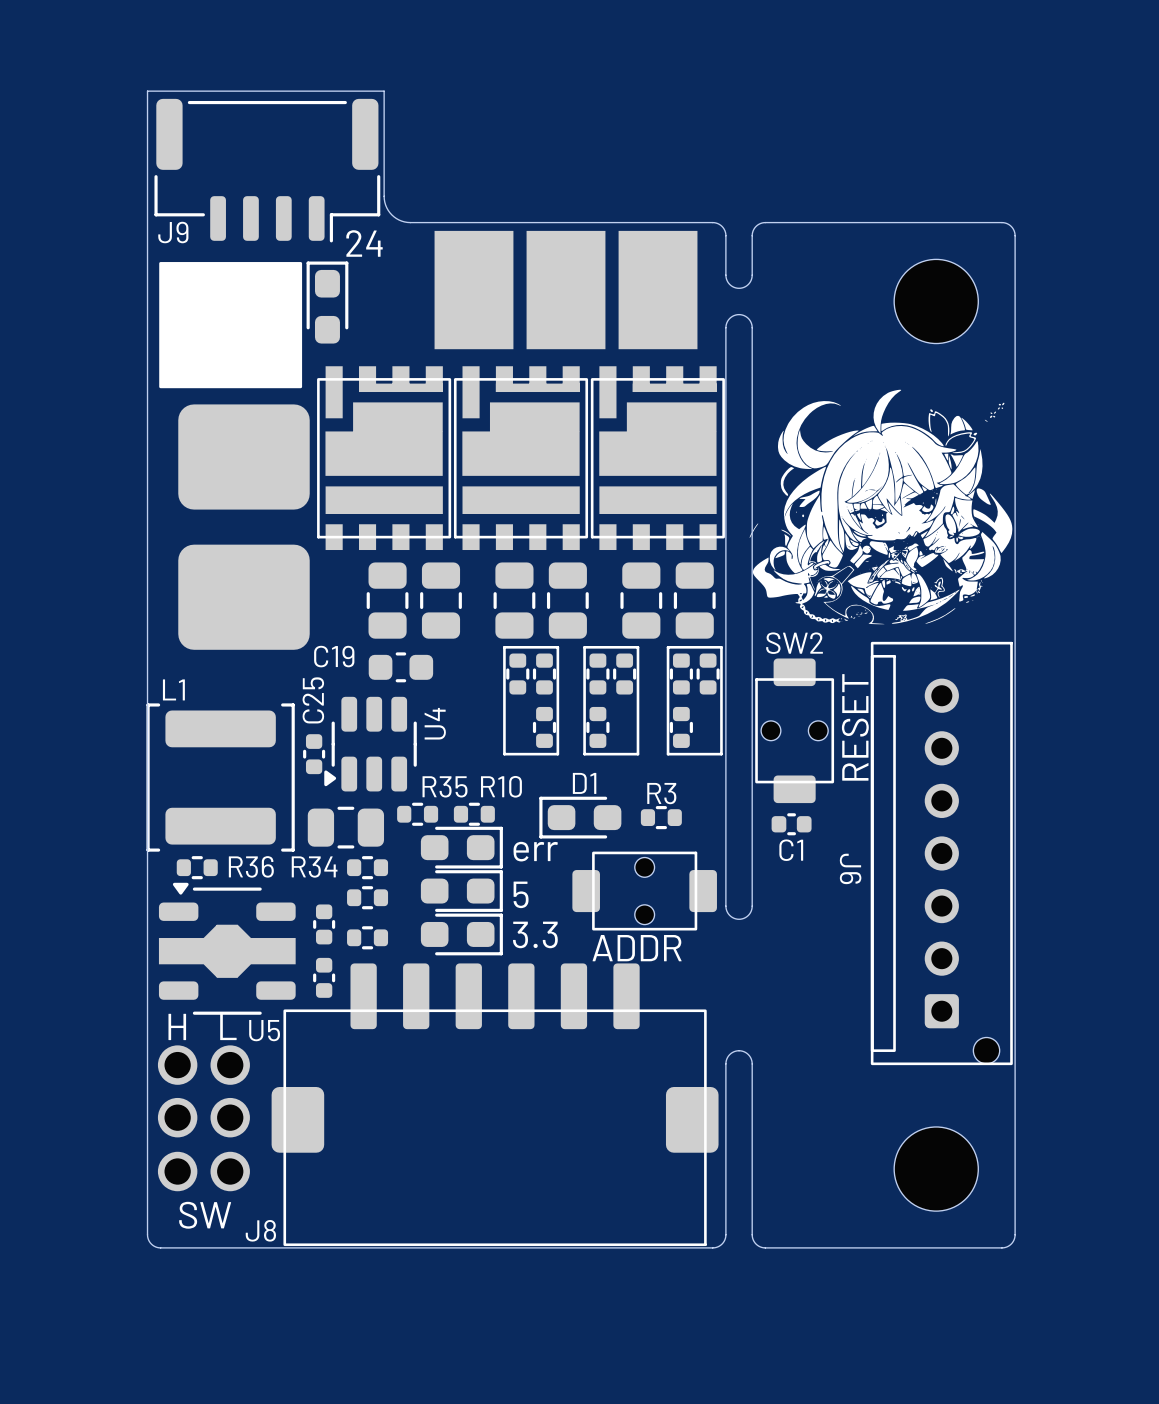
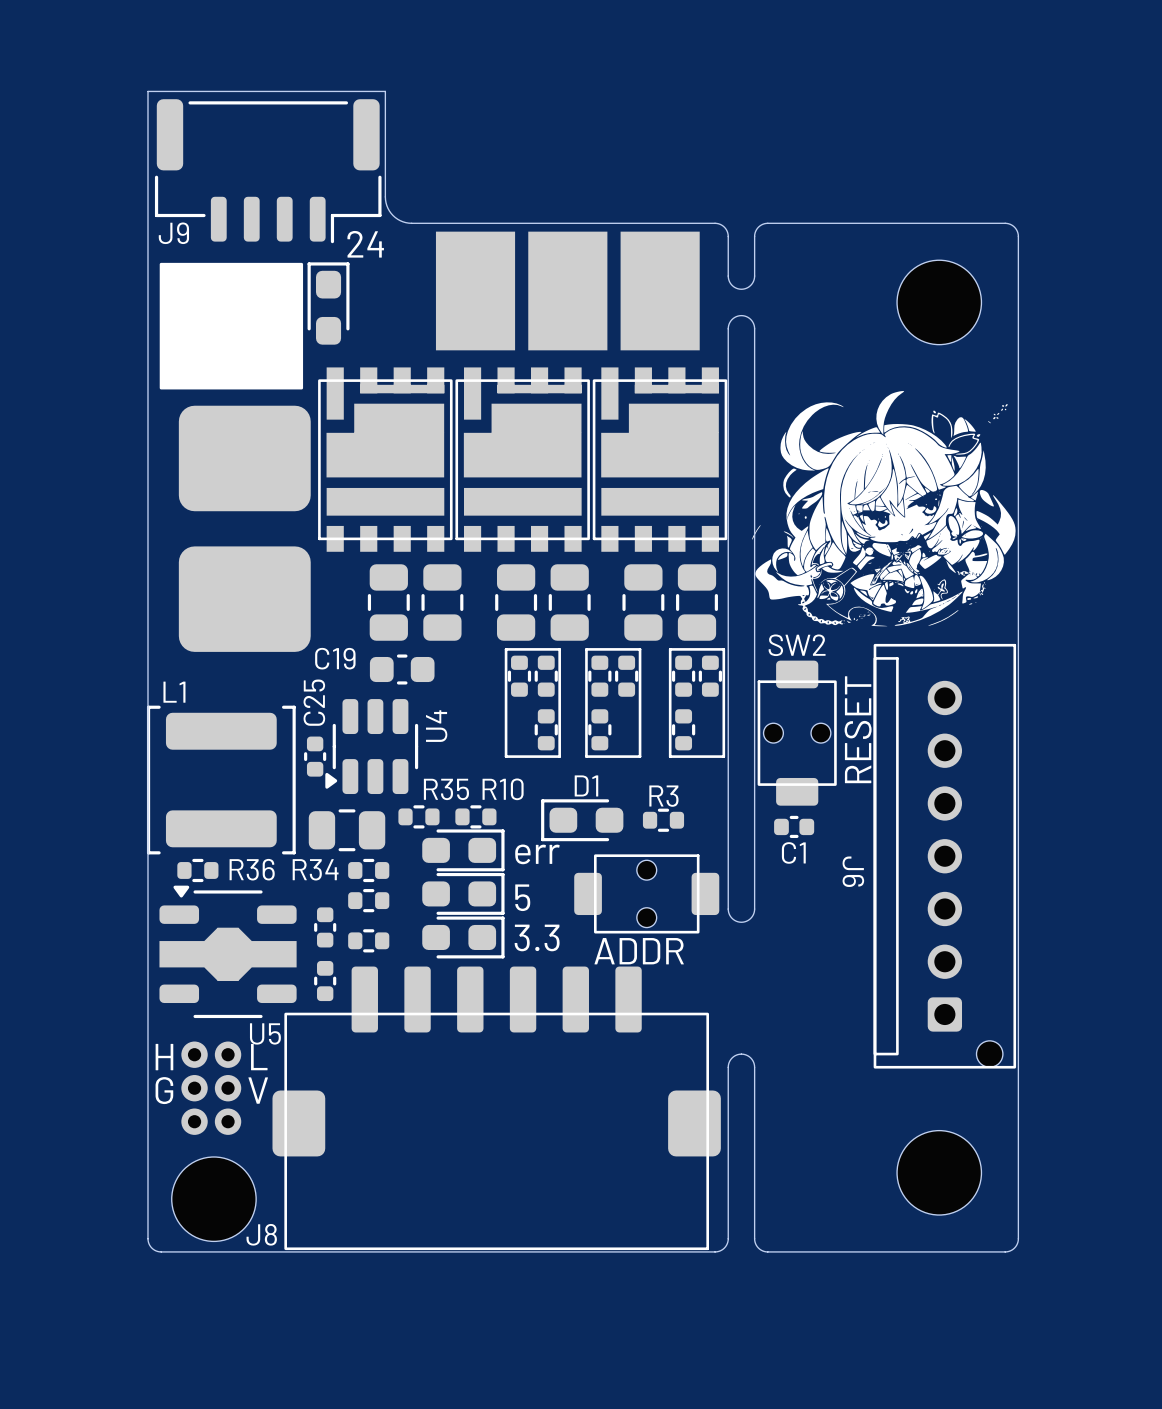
text position: H (177, 1026) -> H (164, 1057)
text position: L (228, 1026) -> L (259, 1057)
part: none -> (211, 1071)
text: none -> G (164, 1090)
text: none -> V (258, 1090)
part: (203, 1091) -> none
part: none -> (211, 1121)
part footprint: [157, 1151, 250, 1192] -> [171, 1156, 257, 1242]
text: SW (205, 1215) -> none

